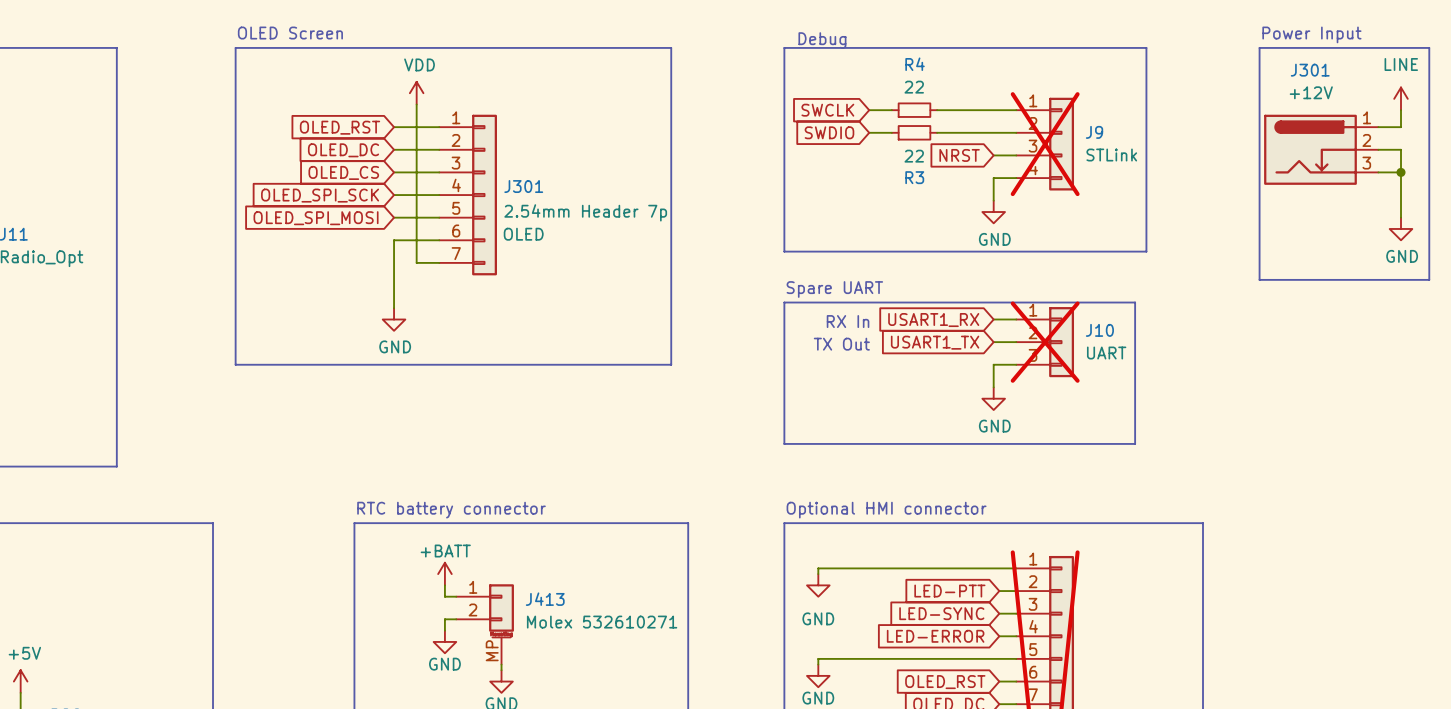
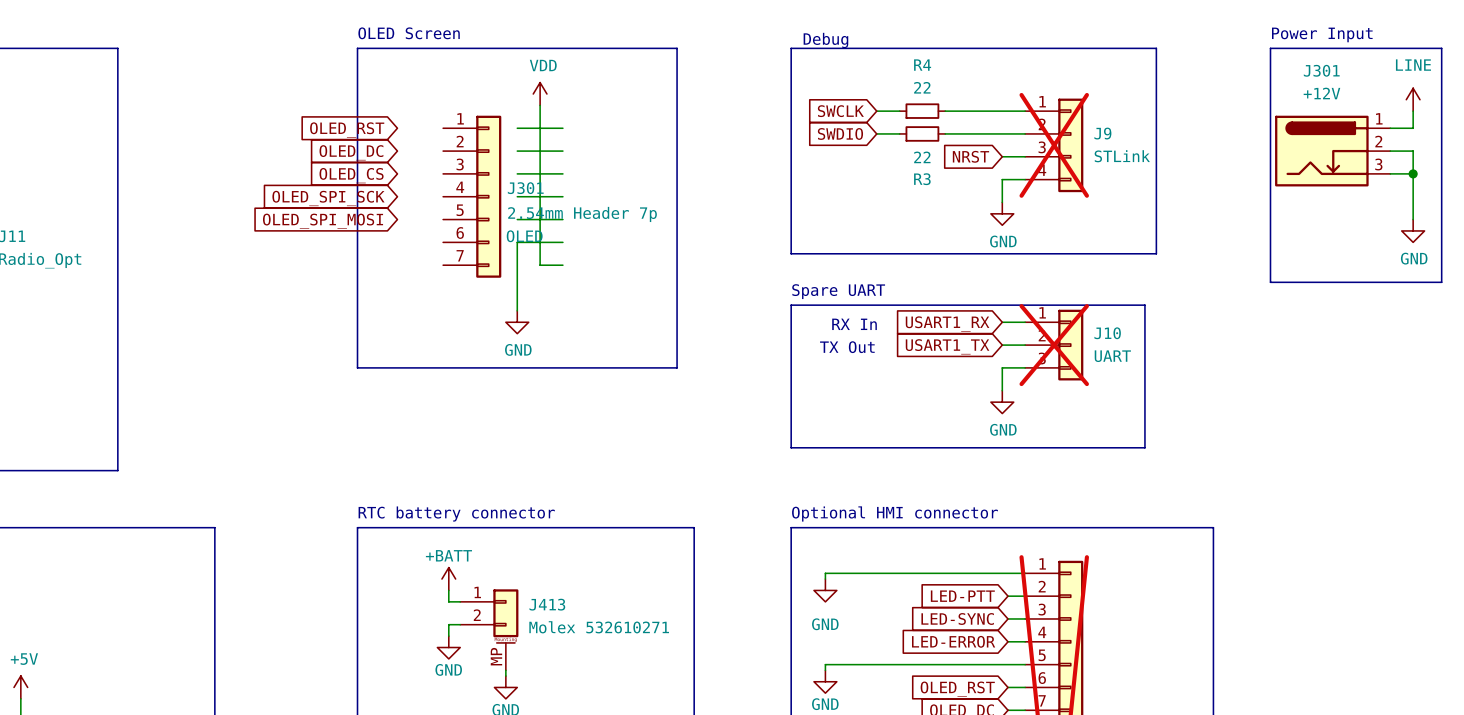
text position: OLED Screen (290, 33) -> OLED Screen (409, 33)
line: (354, 47) (235, 47) (235, 364) (354, 364) -> (357, 48) (357, 367)
power symbol position: VDD (416, 93) -> VDD (540, 94)
wire: (416, 104) (416, 262) (439, 262) -> (540, 105) (540, 265) (562, 265)
wire: (394, 127) (439, 127) -> (517, 128) (562, 128)
wire: (394, 149) (439, 149) -> (517, 151) (562, 151)
wire: (394, 172) (439, 172) -> (517, 173) (562, 173)
wire: (394, 195) (439, 195) -> (517, 196) (562, 196)
wire: (394, 217) (439, 217) -> (517, 219) (562, 219)
wire: (439, 240) (394, 240) (394, 308) -> (562, 242) (517, 242) (517, 310)
power symbol position: GND (394, 319) -> GND (517, 322)

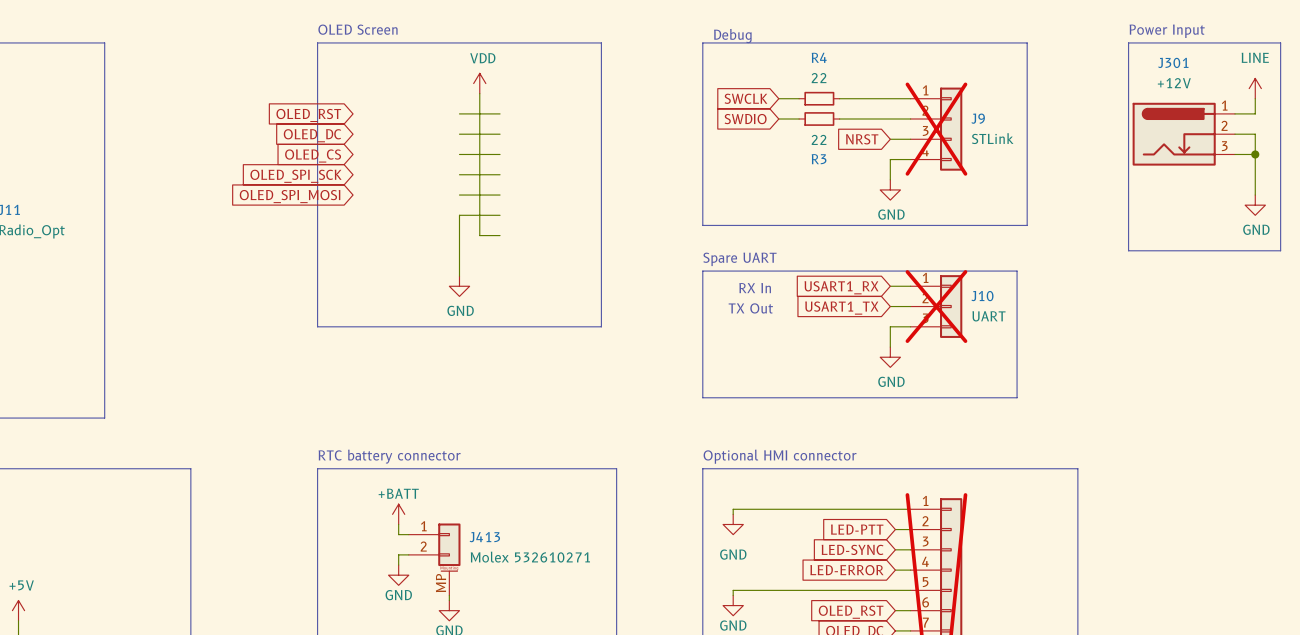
J301: 2.54mm Header 7p (472, 196) -> none

